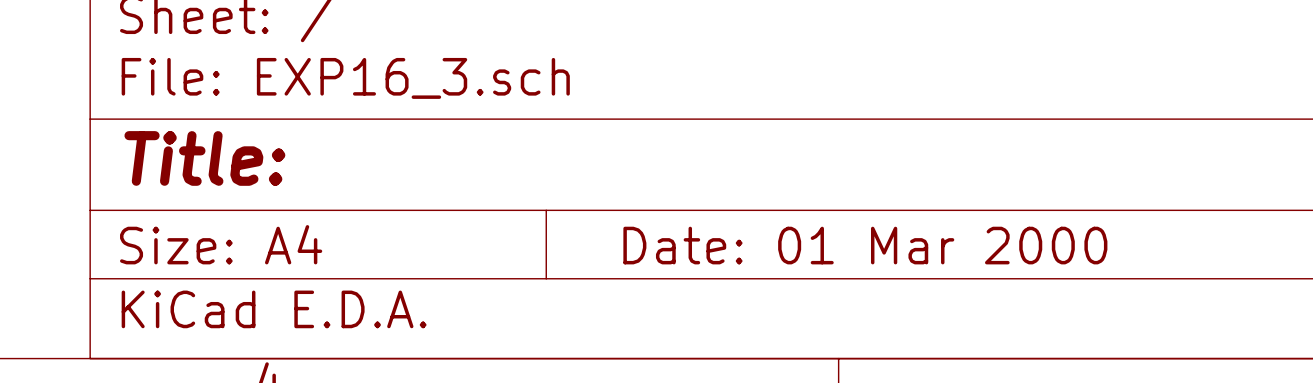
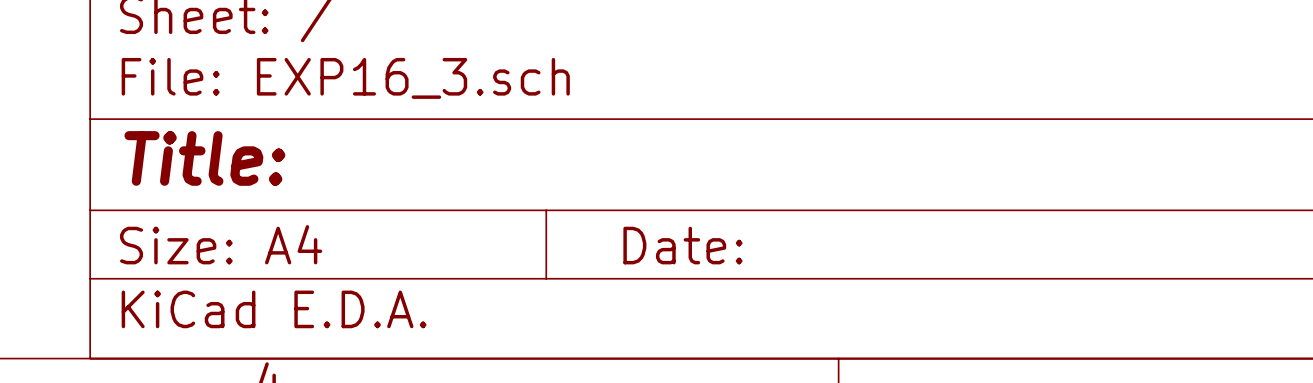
title block: Date: 01 Mar 2000 (865, 245) -> Date: (682, 245)

